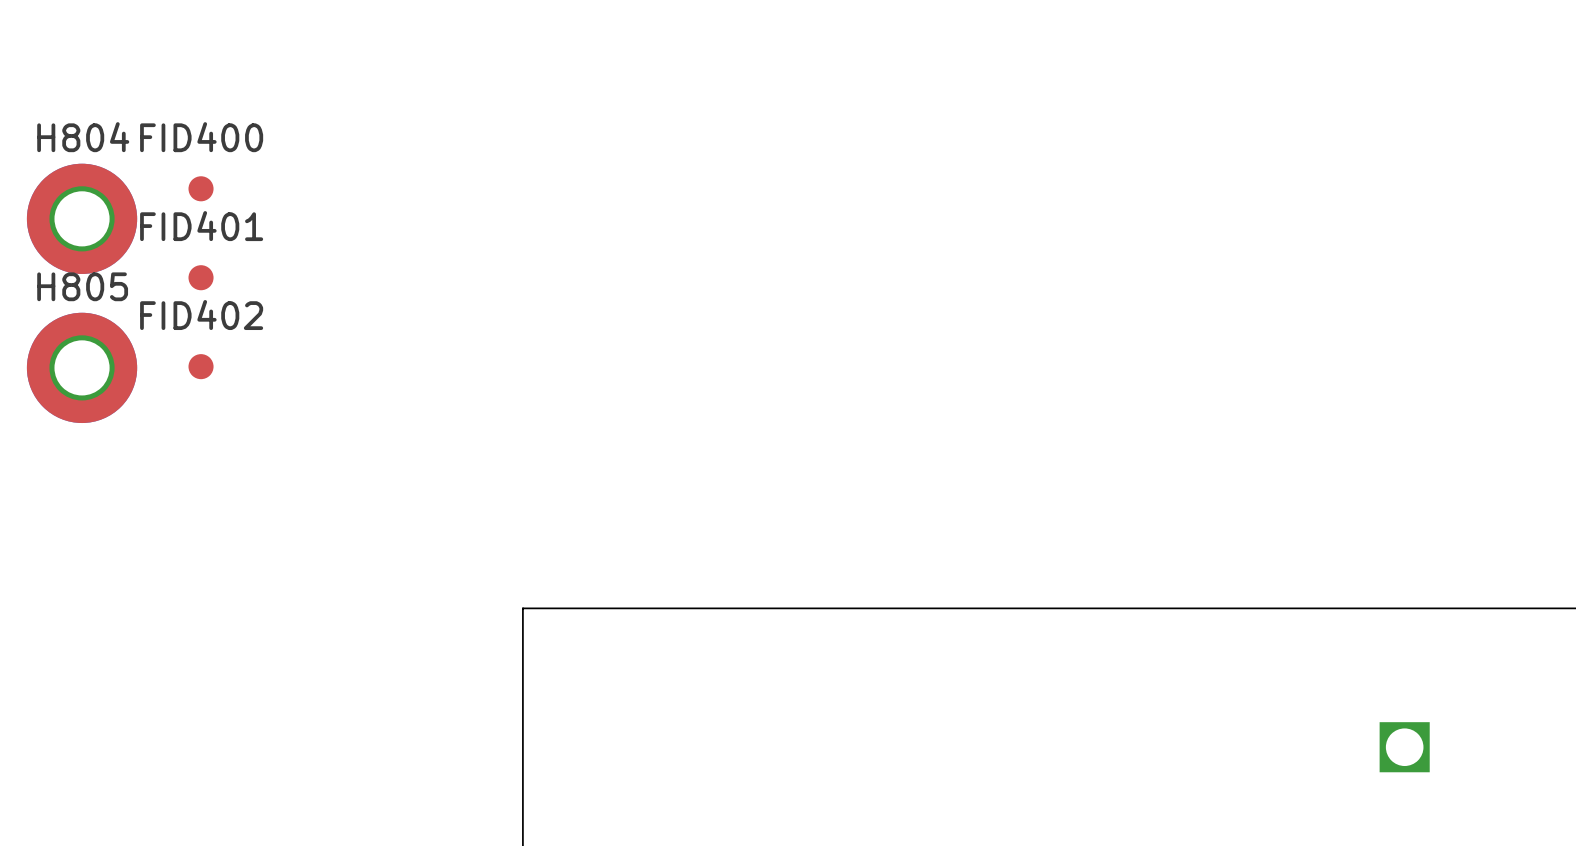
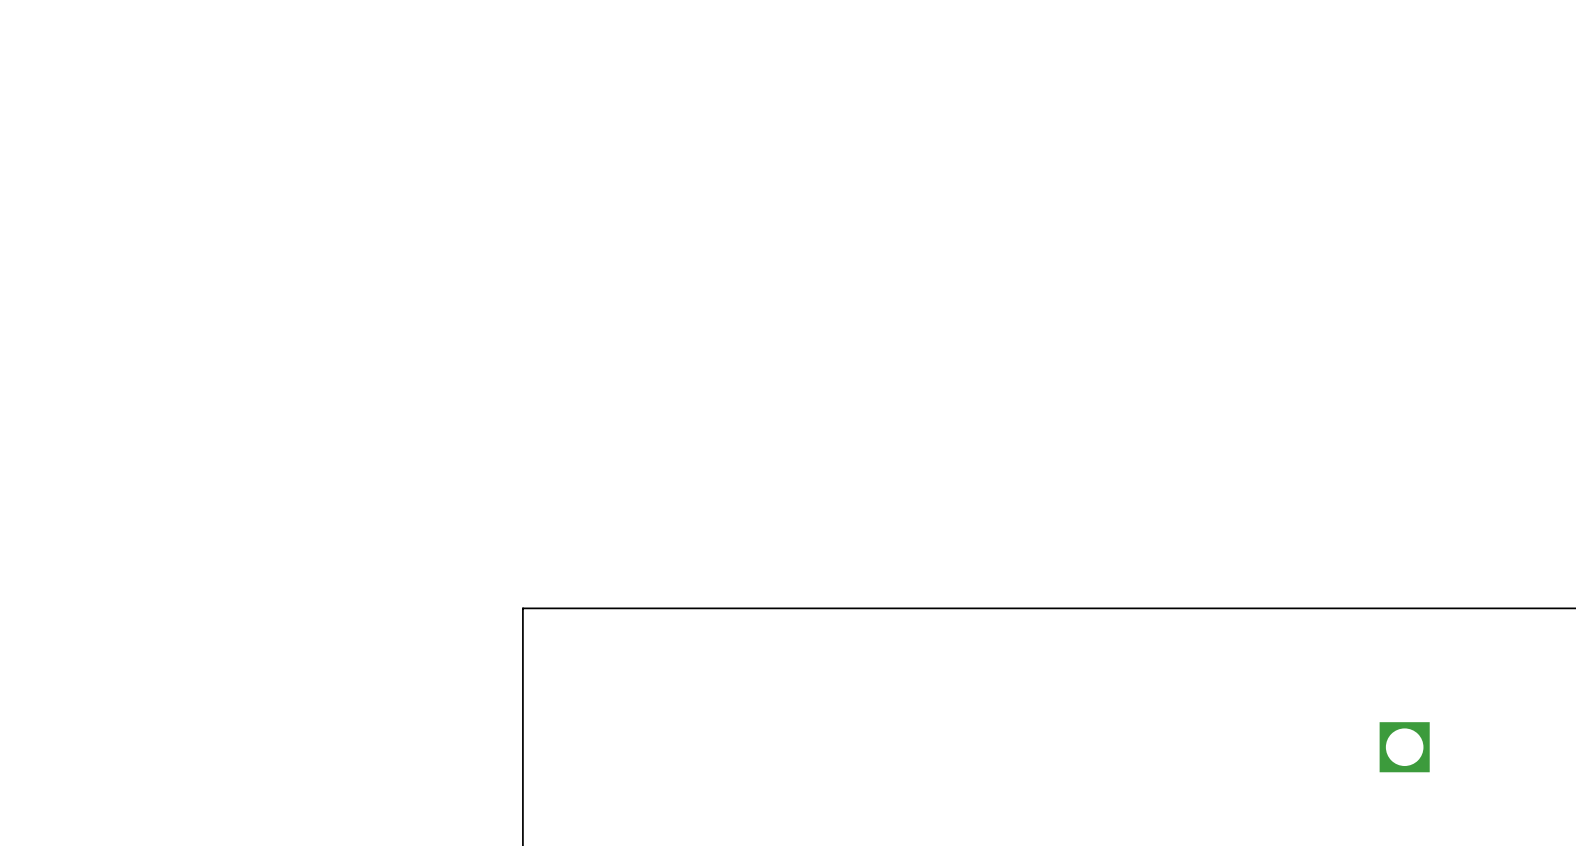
FID400: (201, 188) -> none
H804: (82, 218) -> none
FID401: (201, 277) -> none
FID402: (201, 366) -> none
H805: (82, 367) -> none

